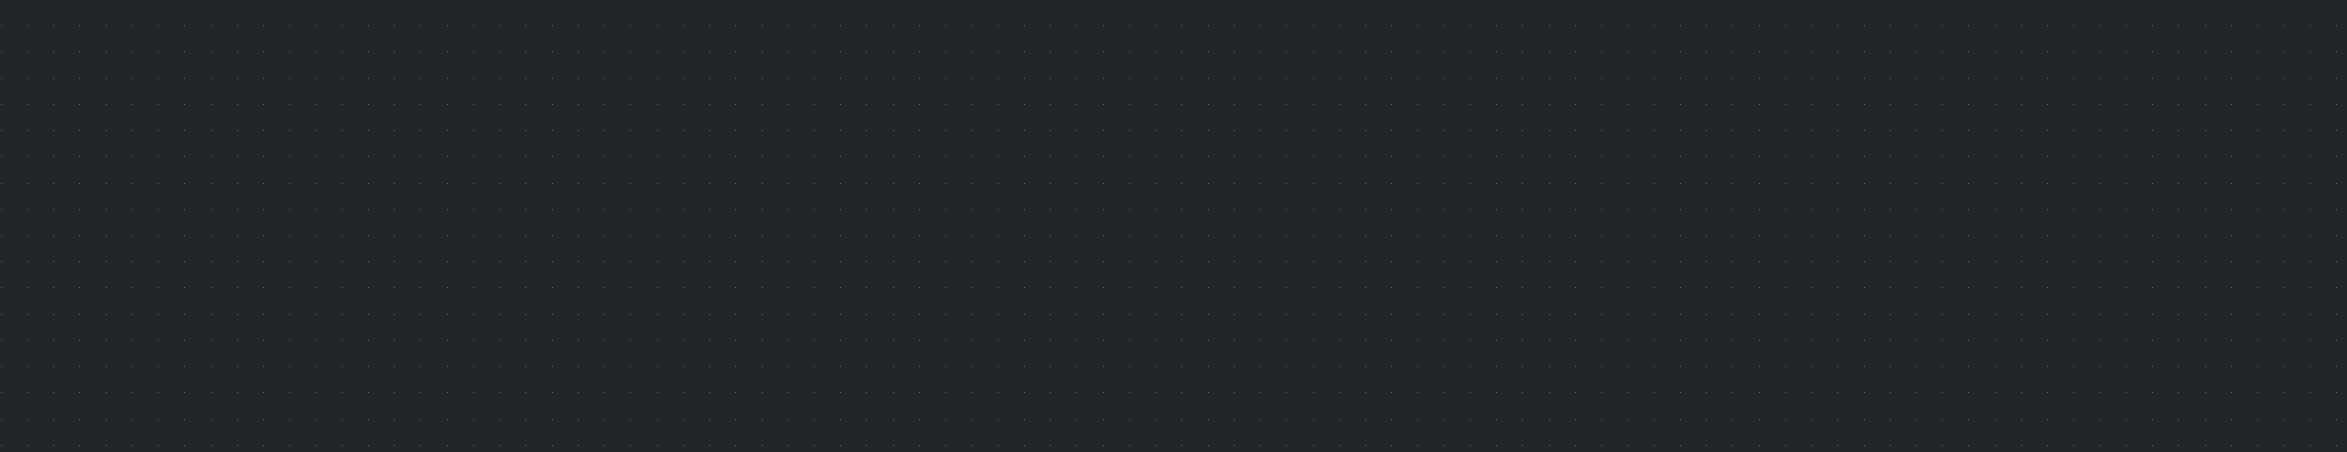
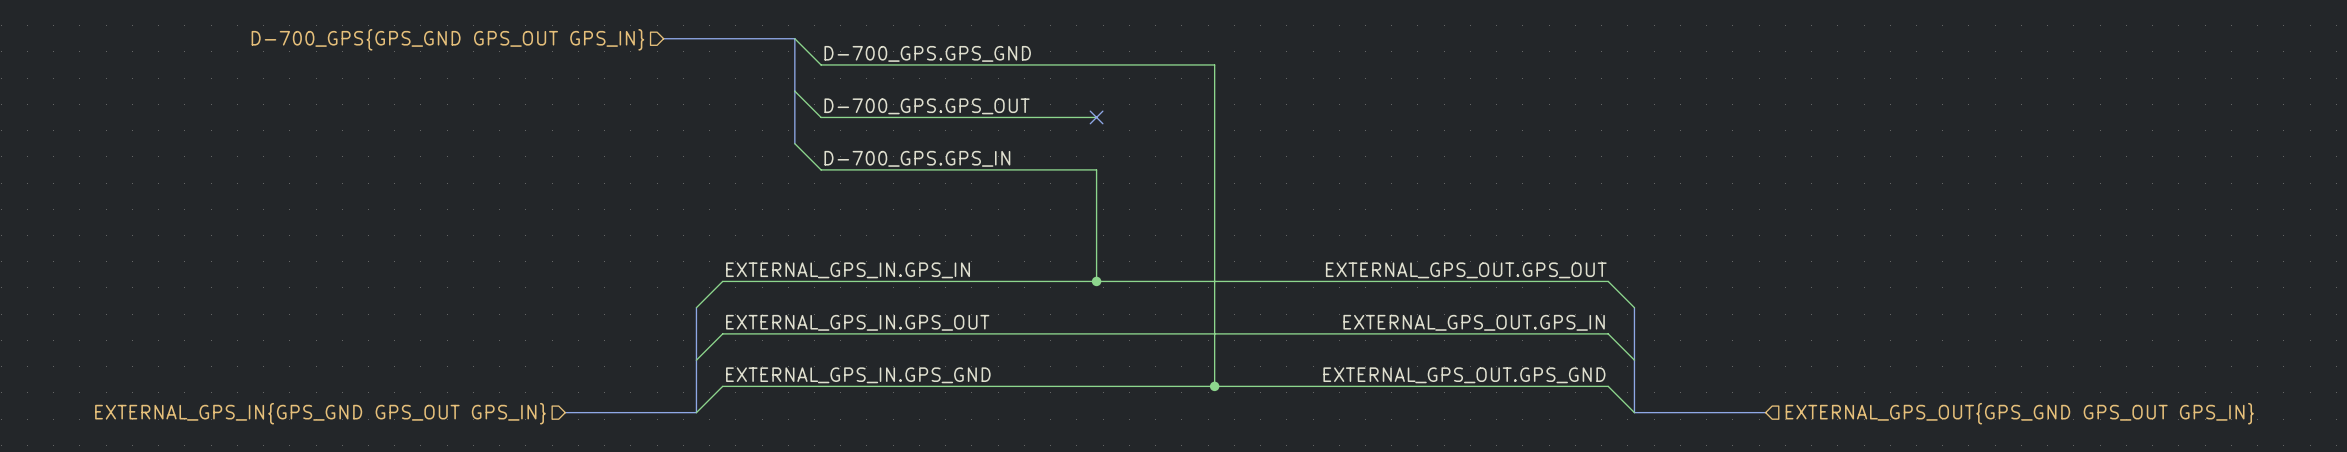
bus: none -> (663, 38) (794, 38) (794, 143)
wire: none -> (794, 38) (821, 64) (1214, 64) (1214, 386)
hierarchical label: none -> D-700_GPS{GPS_GND GPS_OUT GPS_IN} (447, 39)
label: none -> D-700_GPS.GPS_GND (927, 53)
wire: none -> (794, 91) (821, 117) (1096, 117)
label: none -> D-700_GPS.GPS_OUT (927, 106)
no-connect mark: none -> (1096, 117)
wire: none -> (794, 143) (821, 169) (1096, 169) (1096, 281)
label: none -> D-700_GPS.GPS_IN (917, 158)
label: none -> EXTERNAL_GPS_IN.GPS_IN (848, 270)
label: none -> EXTERNAL_GPS_OUT.GPS_OUT (1466, 270)
wire: none -> (722, 281) (696, 307)
wire: none -> (722, 281) (1608, 281)
junction: none -> (1096, 281)
wire: none -> (1608, 281) (1634, 307)
bus: none -> (696, 307) (696, 412) (565, 412)
bus: none -> (1634, 307) (1634, 412) (1765, 412)
label: none -> EXTERNAL_GPS_IN.GPS_OUT (857, 322)
label: none -> EXTERNAL_GPS_OUT.GPS_IN (1474, 322)
wire: none -> (722, 333) (696, 360)
wire: none -> (722, 333) (1608, 333)
wire: none -> (1608, 333) (1634, 360)
label: none -> EXTERNAL_GPS_IN.GPS_GND (858, 375)
label: none -> EXTERNAL_GPS_OUT.GPS_GND (1464, 375)
wire: none -> (722, 386) (696, 412)
wire: none -> (722, 386) (1608, 386)
junction: none -> (1214, 386)
wire: none -> (1608, 386) (1634, 412)
hierarchical label: none -> EXTERNAL_GPS_IN{GPS_GND GPS_OUT GPS_IN} (320, 413)
hierarchical label: none -> EXTERNAL_GPS_OUT{GPS_GND GPS_OUT GPS_IN} (2019, 413)

